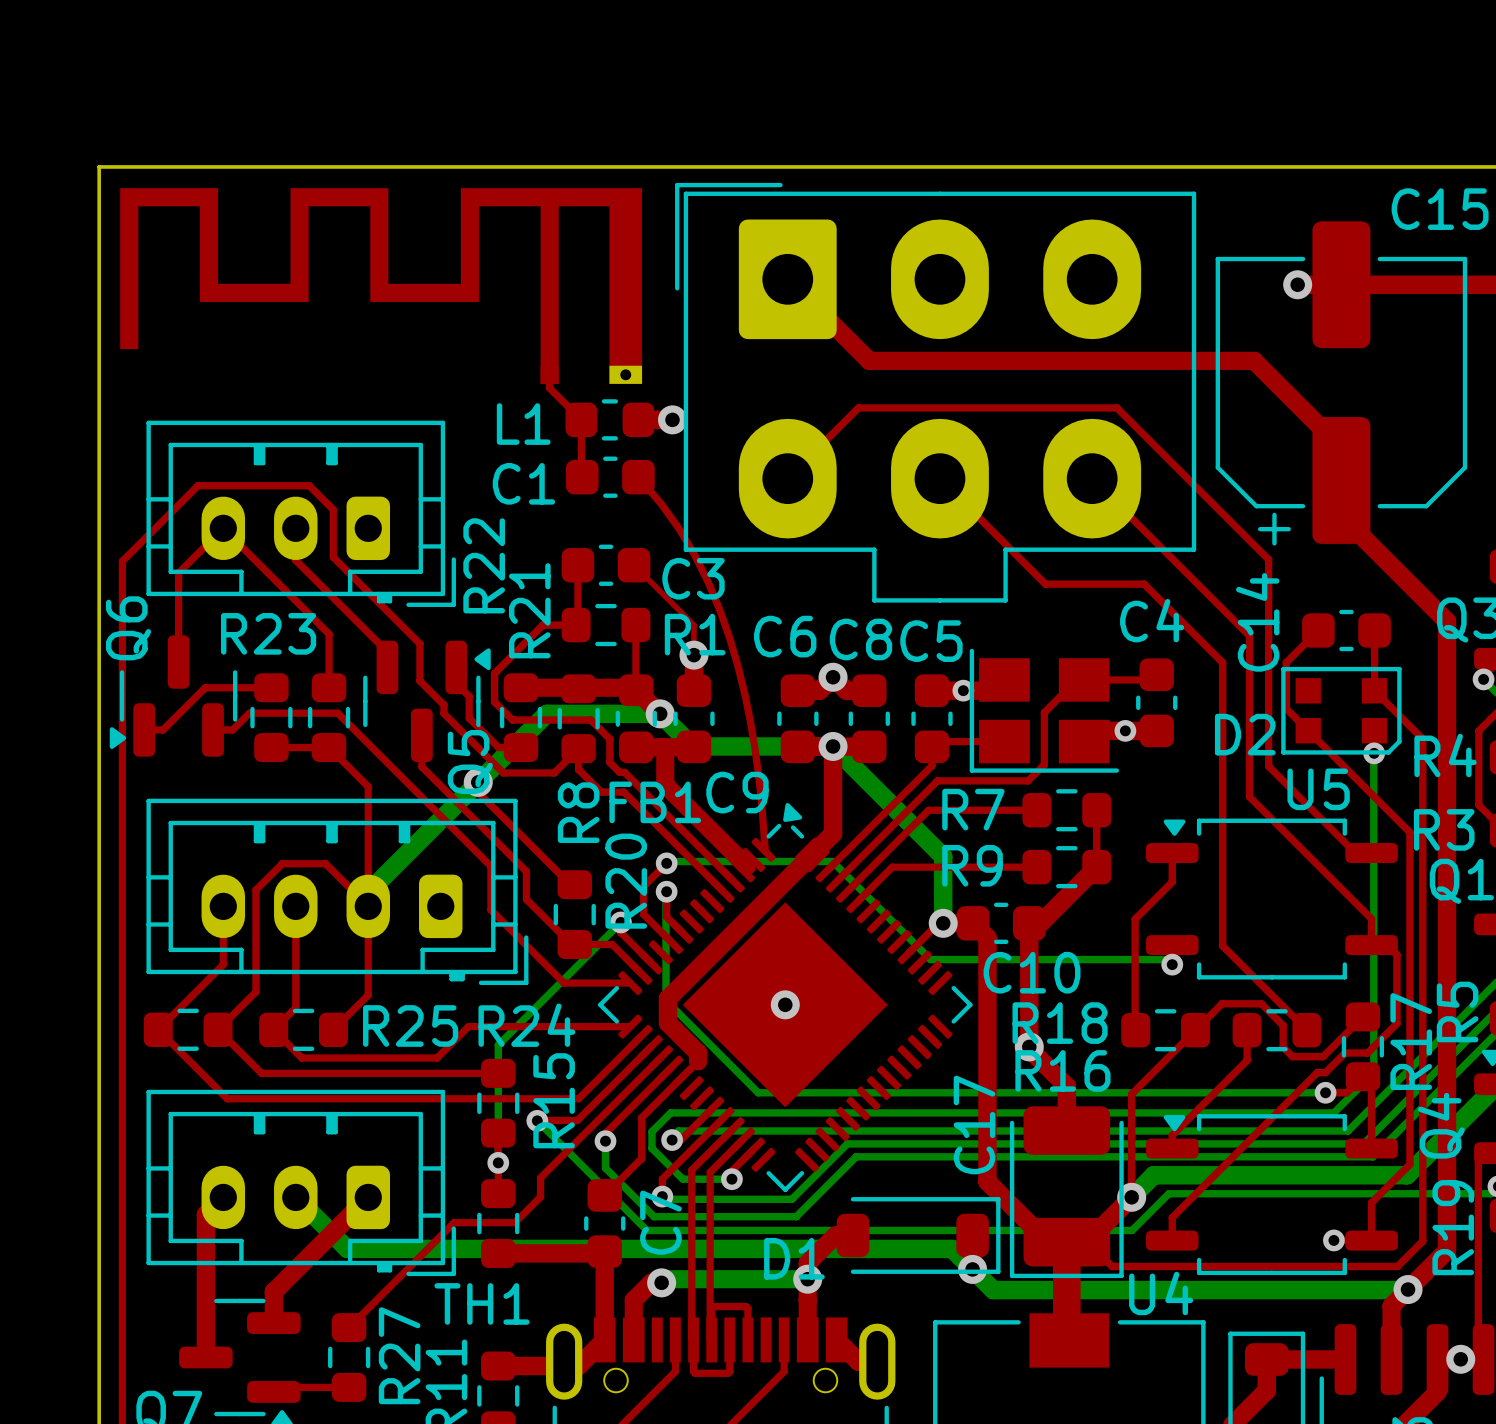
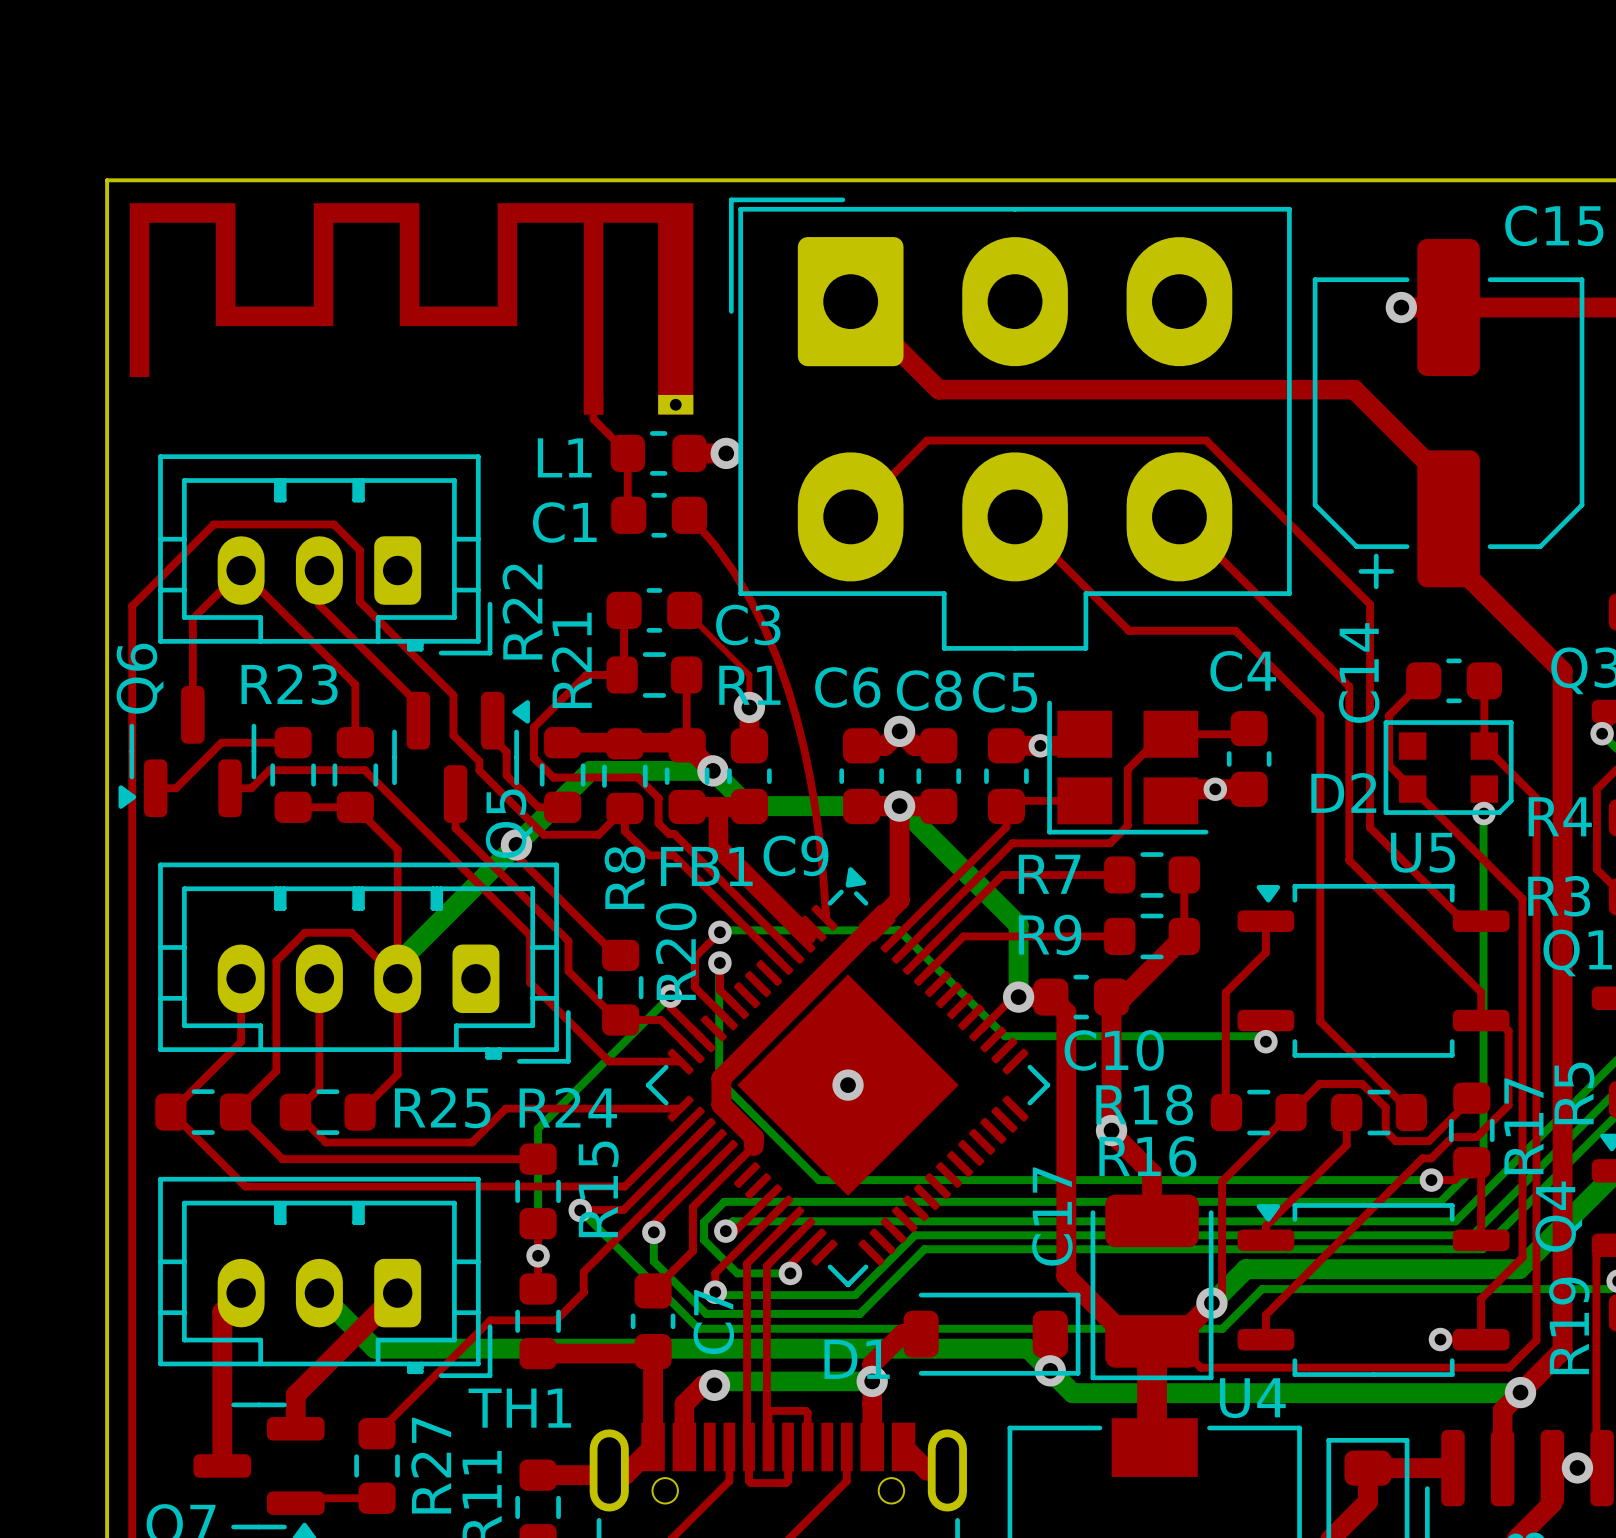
via position: (1131, 1197) -> (1211, 1303)

